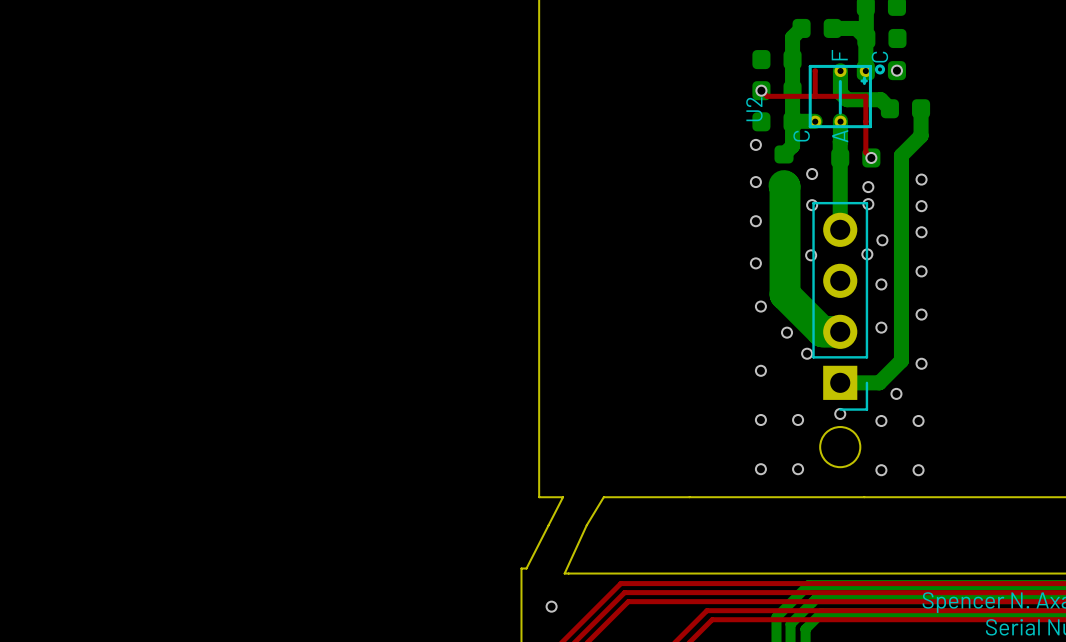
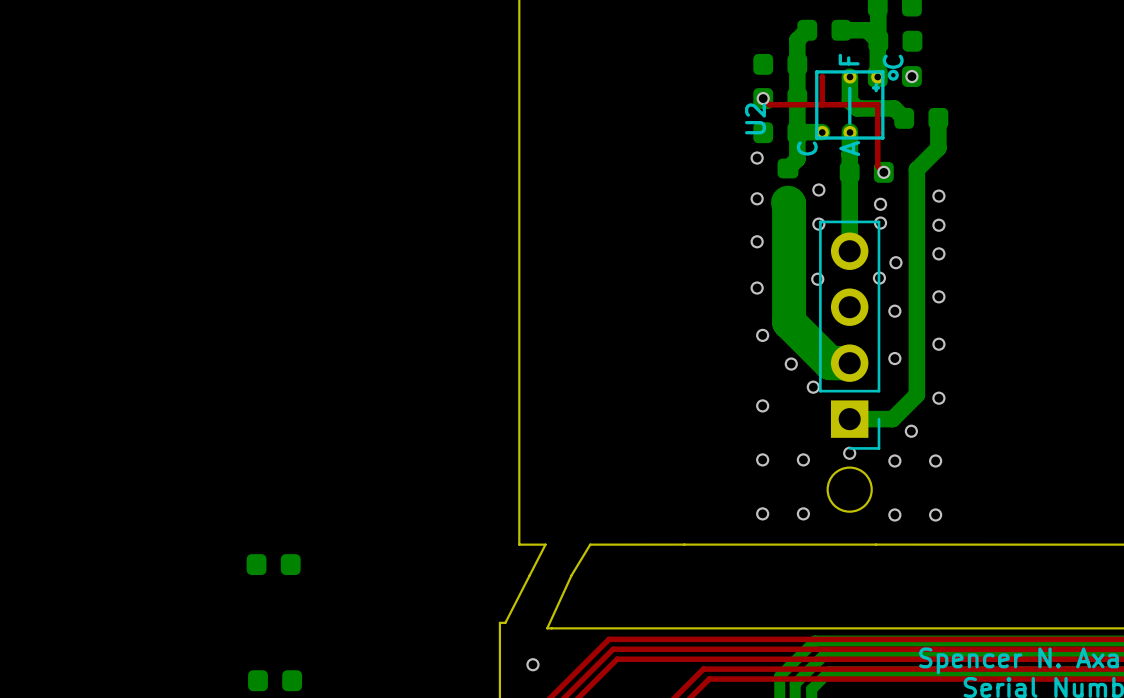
part: none -> (273, 564)
part: none -> (275, 680)

